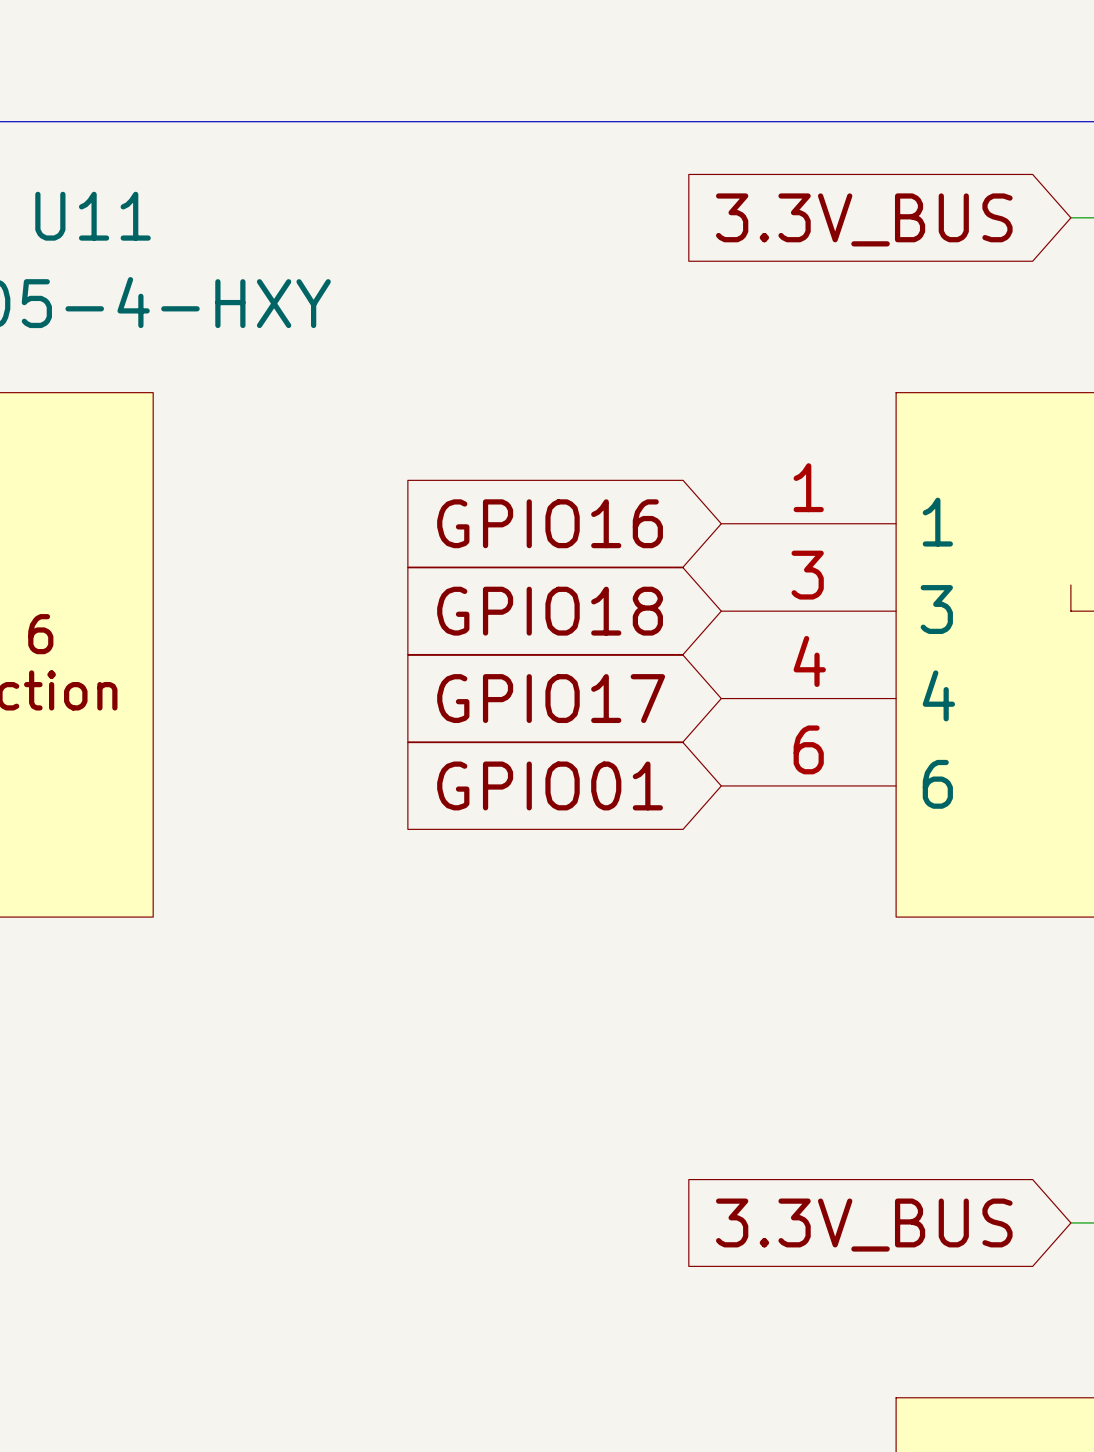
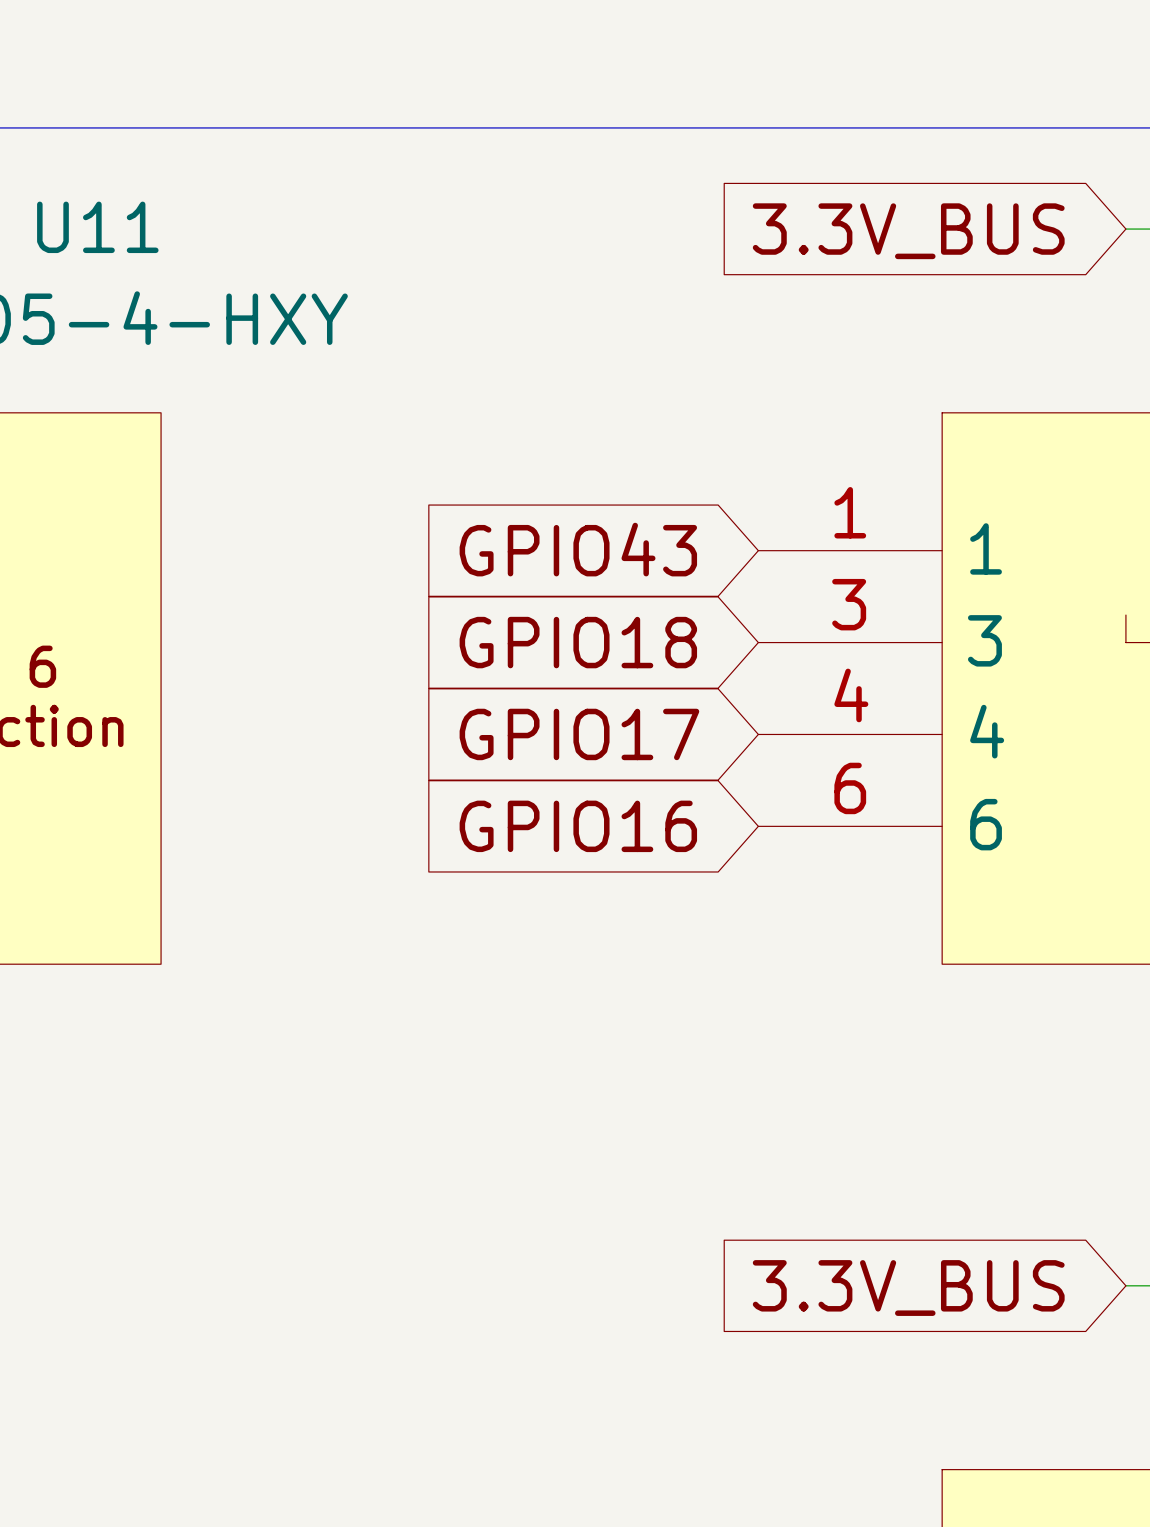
global label: GPIO16 (550, 523) -> GPIO43 (578, 549)
global label: GPIO01 (550, 785) -> GPIO16 (578, 826)

